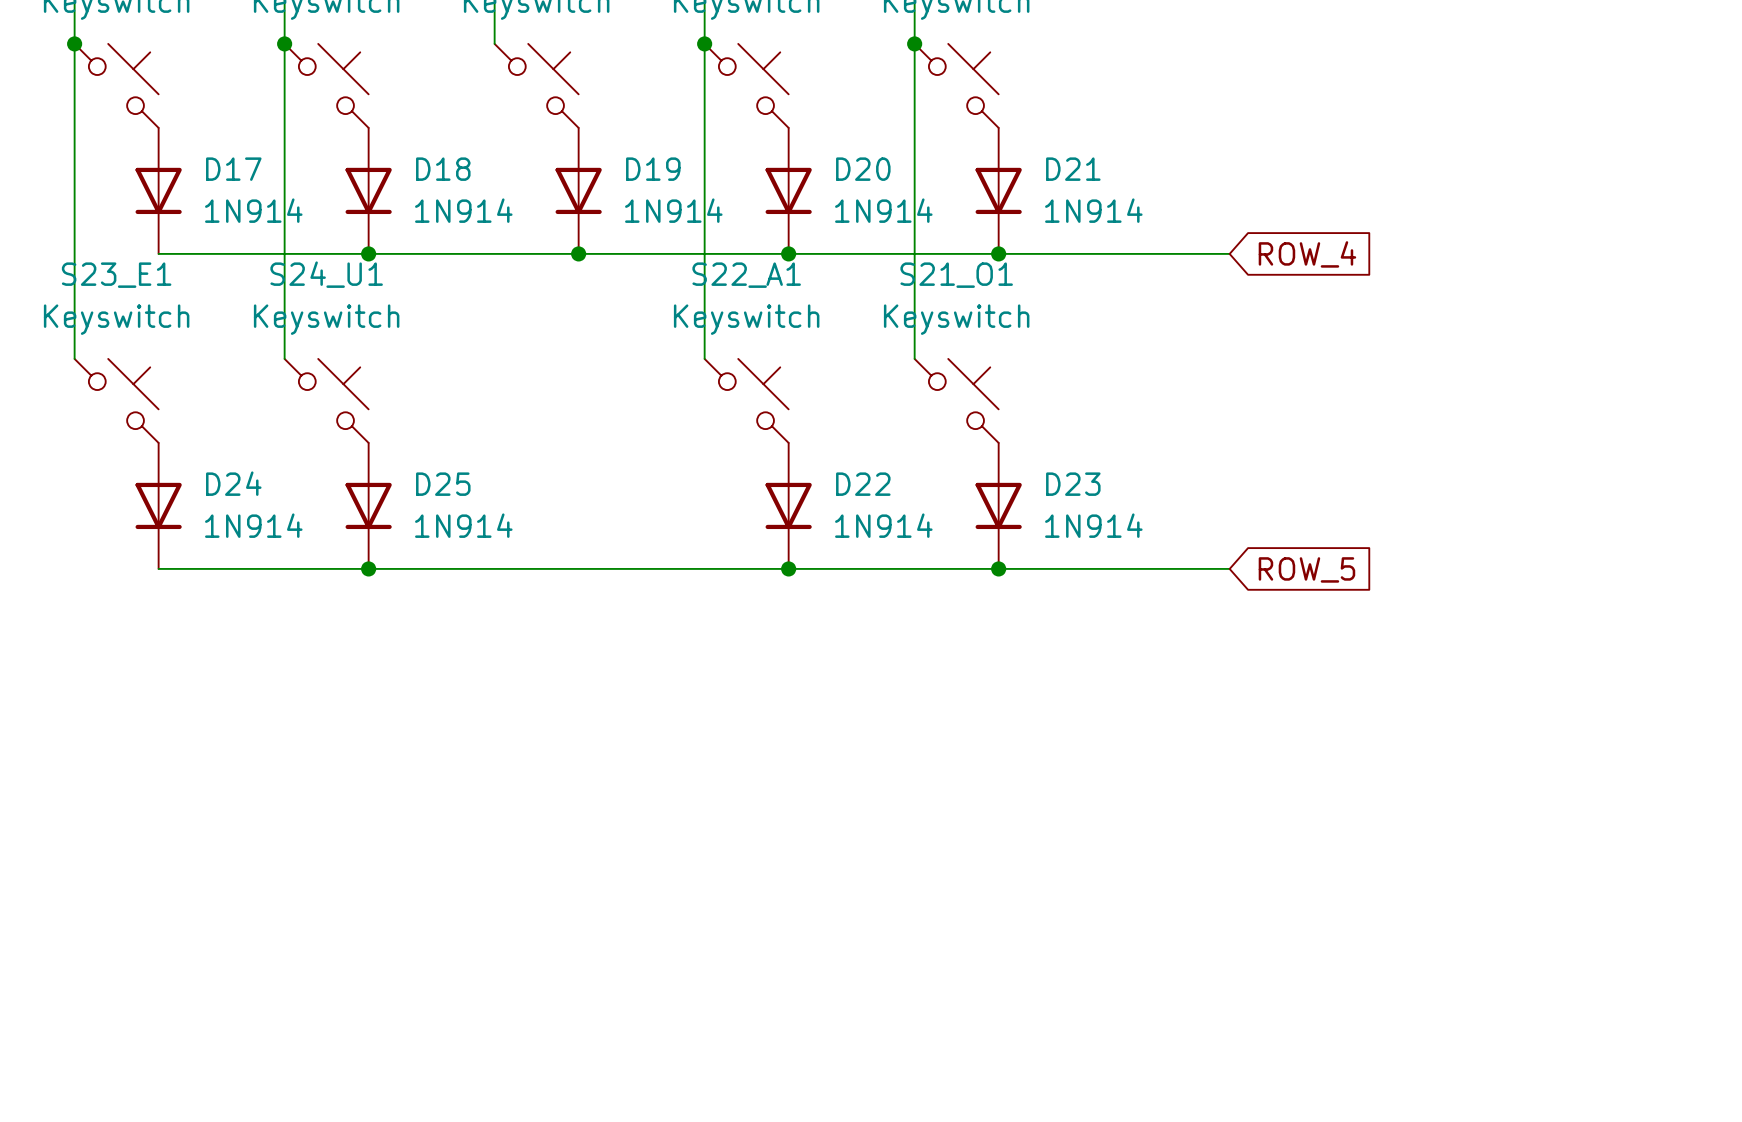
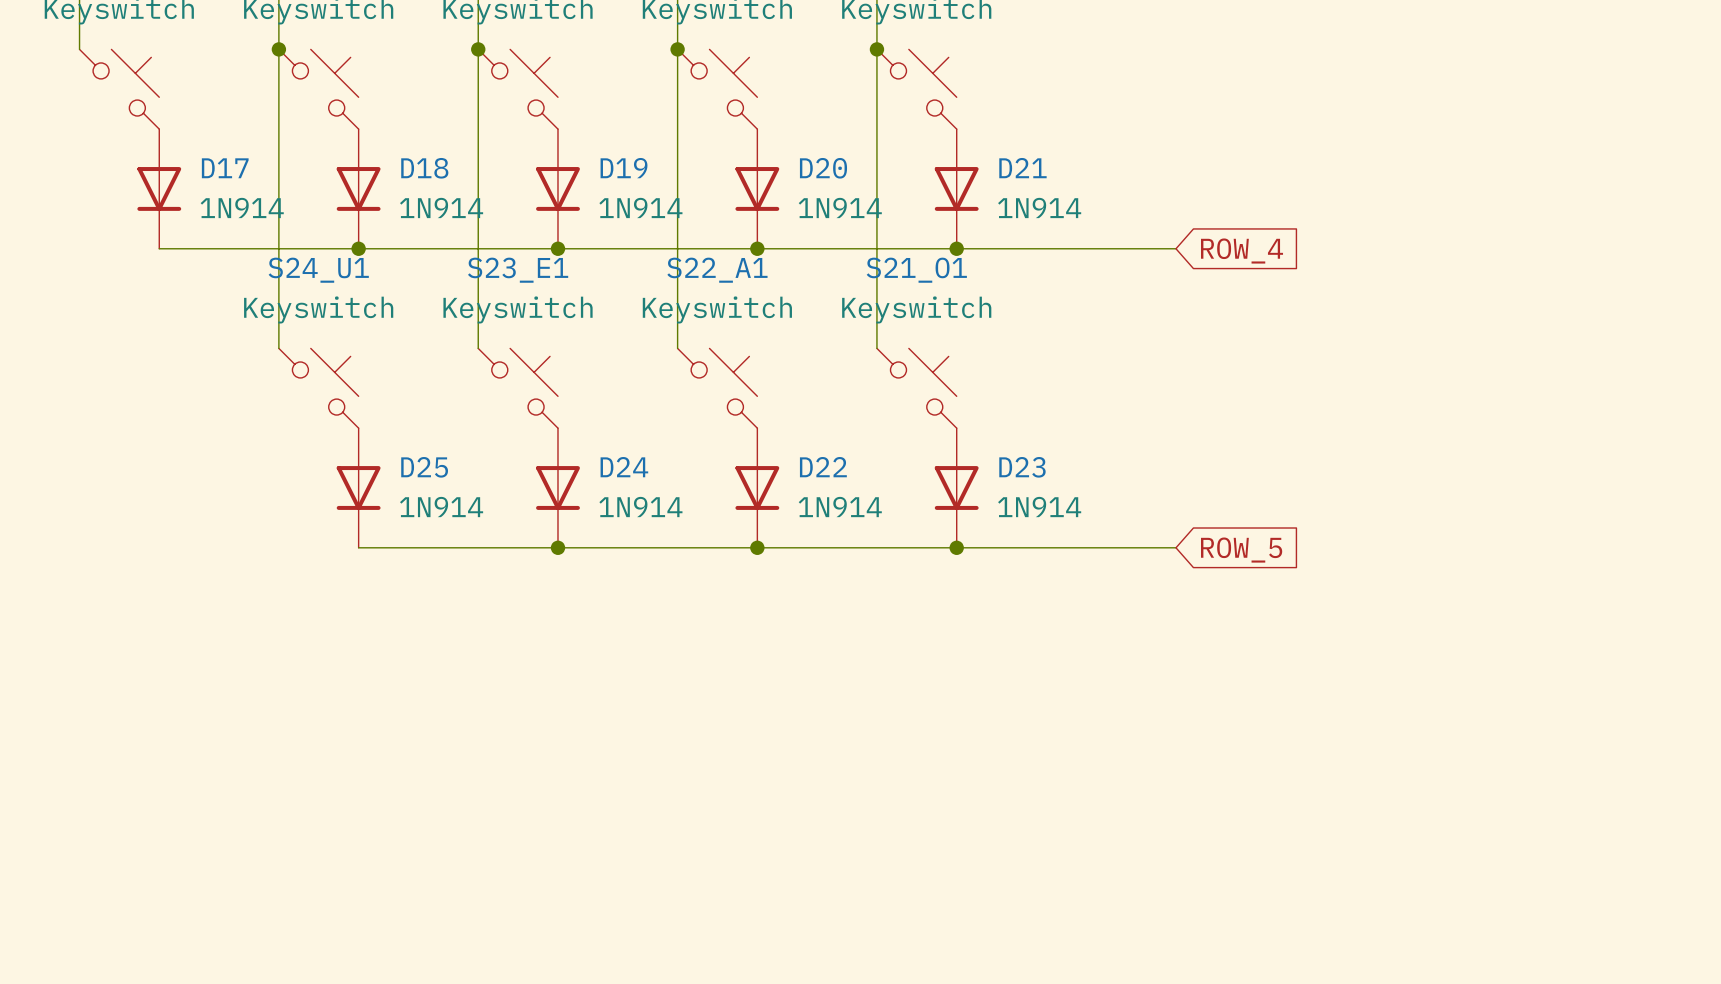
wire: (74, 43) (74, 358) -> none
junction: (74, 43) -> none
wire: none -> (478, 49) (478, 348)
junction: none -> (478, 49)
S23_E1 position: (116, 400) -> (518, 388)
D24 position: (158, 505) -> (557, 487)
wire: (158, 568) (368, 568) -> none
junction: (368, 568) -> none
junction: none -> (557, 547)

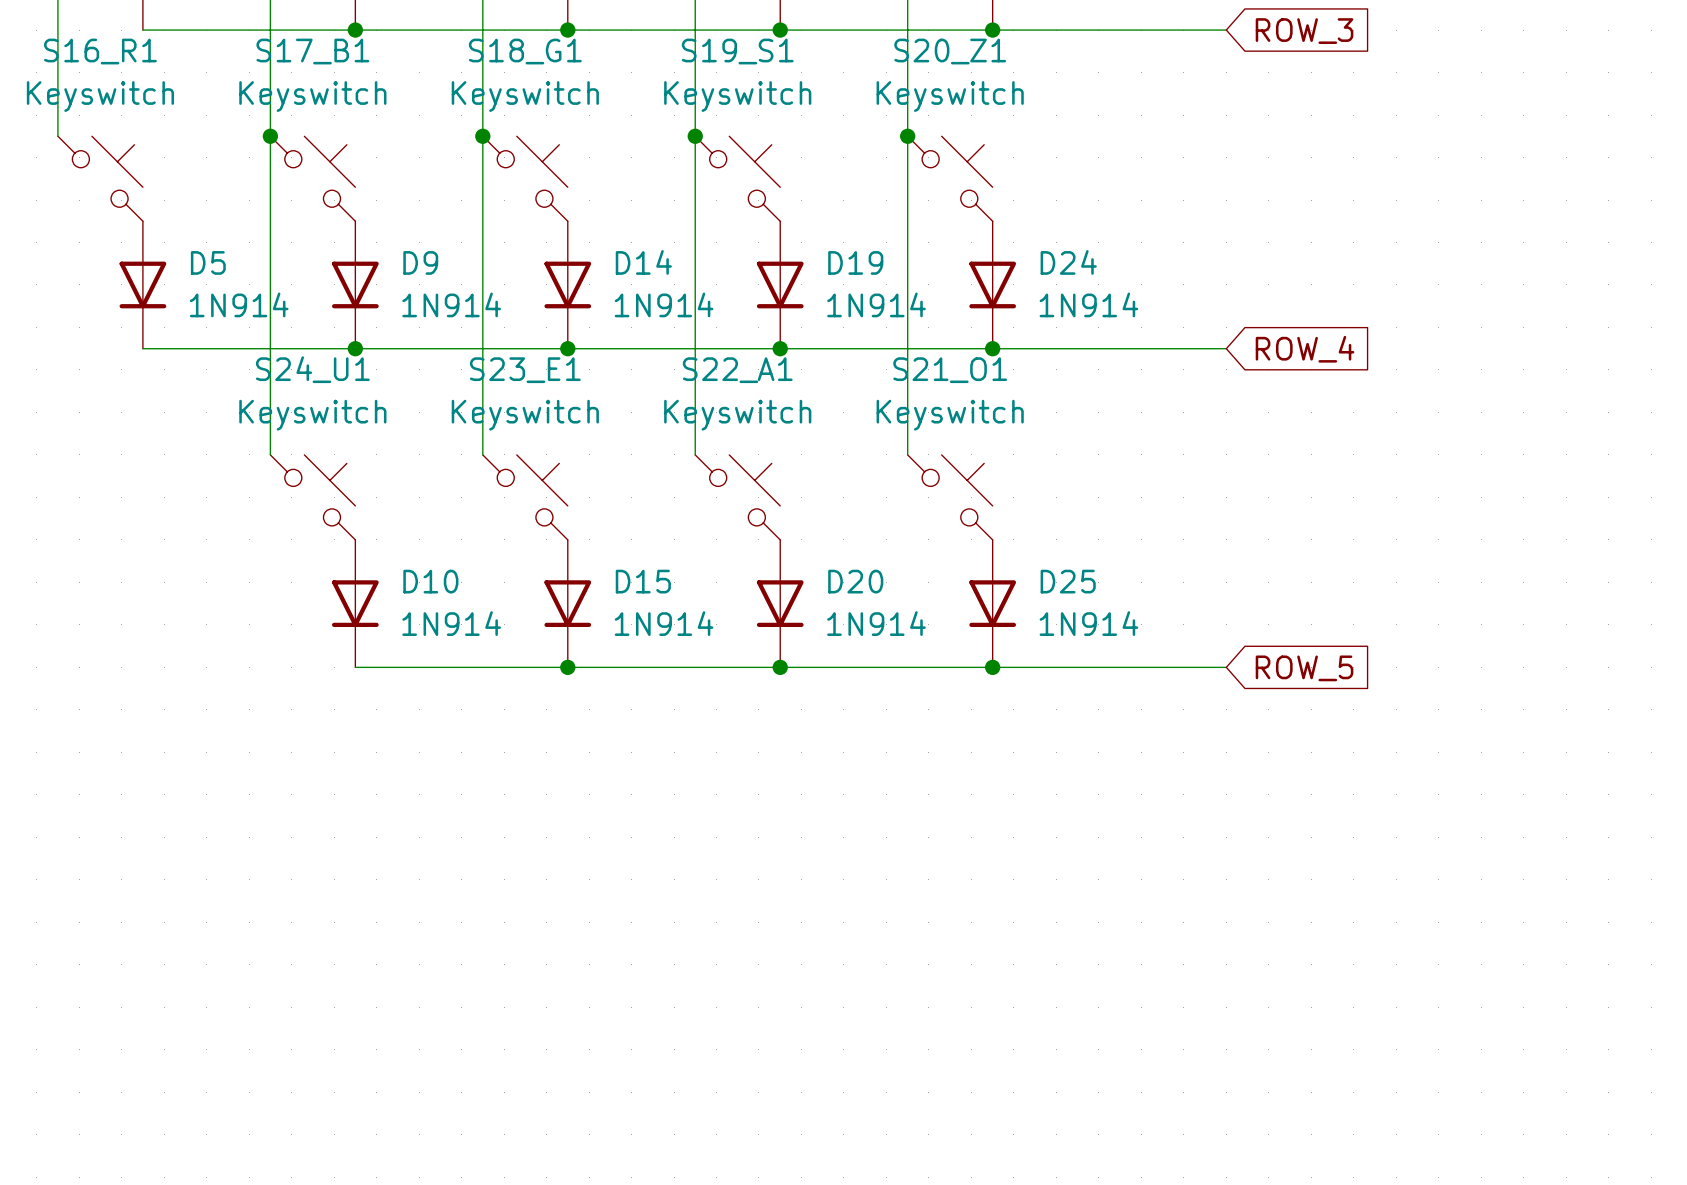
D17 name: D17 (225, 168) -> D5 (208, 262)
D18 name: D18 (424, 168) -> D9 (420, 262)
D19 name: D19 (624, 168) -> D14 (643, 262)
D20 name: D20 (823, 168) -> D19 (855, 262)
D21 name: D21 (1022, 168) -> D24 (1068, 262)
D25 name: D25 (424, 467) -> D10 (430, 581)
D24 name: D24 (624, 467) -> D15 (643, 581)
D22 name: D22 (823, 467) -> D20 (855, 581)
D23 name: D23 (1022, 467) -> D25 (1068, 581)

